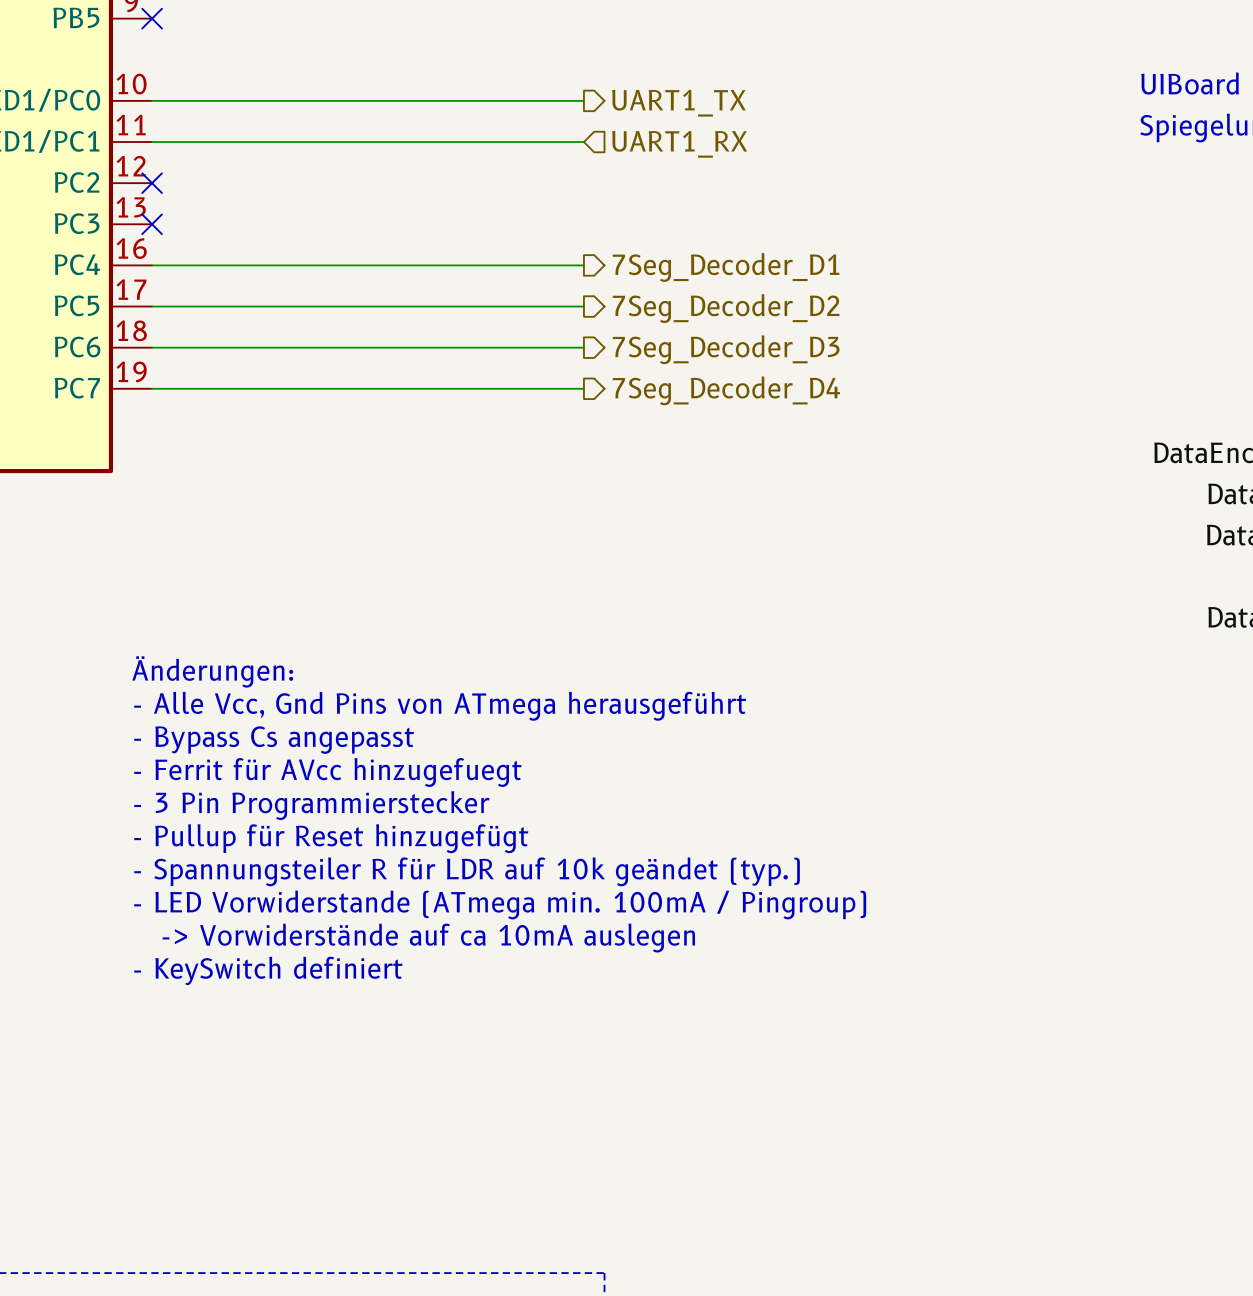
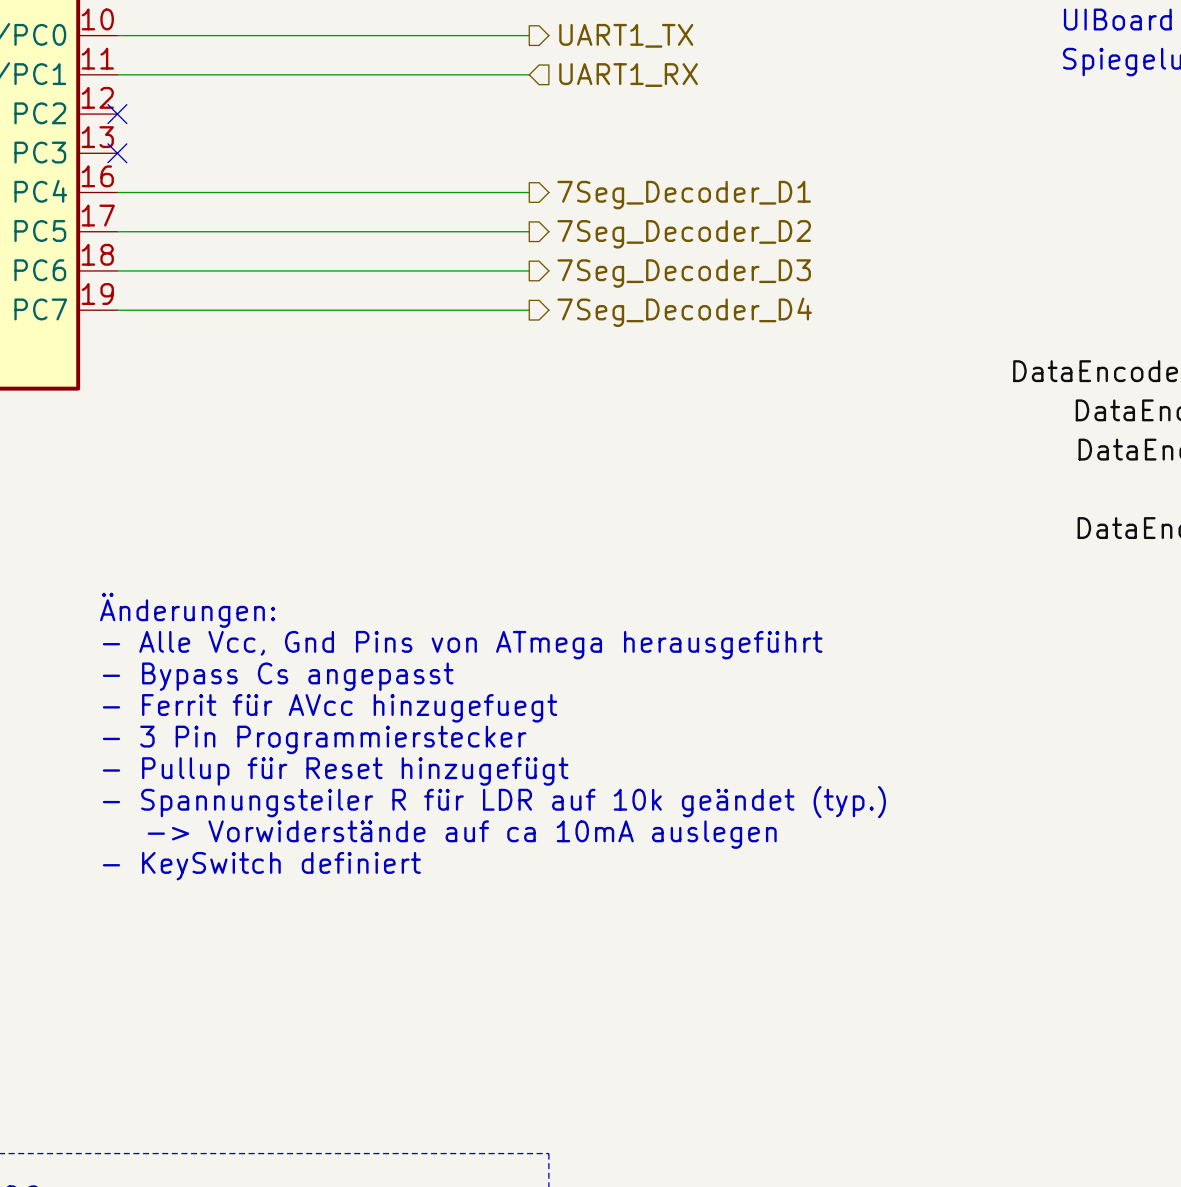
text: Änderungen: (212, 671) -> none
text: - Alle Vcc, Gnd Pins von ATmega herausgeführt (440, 706) -> Änderungen: (187, 610)
text: - Bypass Cs angepasst (274, 740) -> - Alle Vcc, Gnd Pins von ATmega herausgeführt (462, 645)
text: - Ferrit für AVcc hinzugefuegt (327, 772) -> - Bypass Cs angepasst (278, 676)
text: - 3 Pin Programmierstecker (311, 805) -> - Ferrit für AVcc hinzugefuegt (330, 708)
text: - Pullup für Reset hinzugefügt (331, 838) -> - 3 Pin Programmierstecker (314, 739)
text: - Spannungsteiler R für LDR auf 10k geändet (typ.) (467, 871) -> - Pullup für Reset hinzugefügt (335, 771)
text: - LED Vorwiderstande (ATmega min. 100mA / Pingroup) (500, 904) -> - Spannungsteiler R für LDR auf 10k geändet (typ.) (494, 802)

